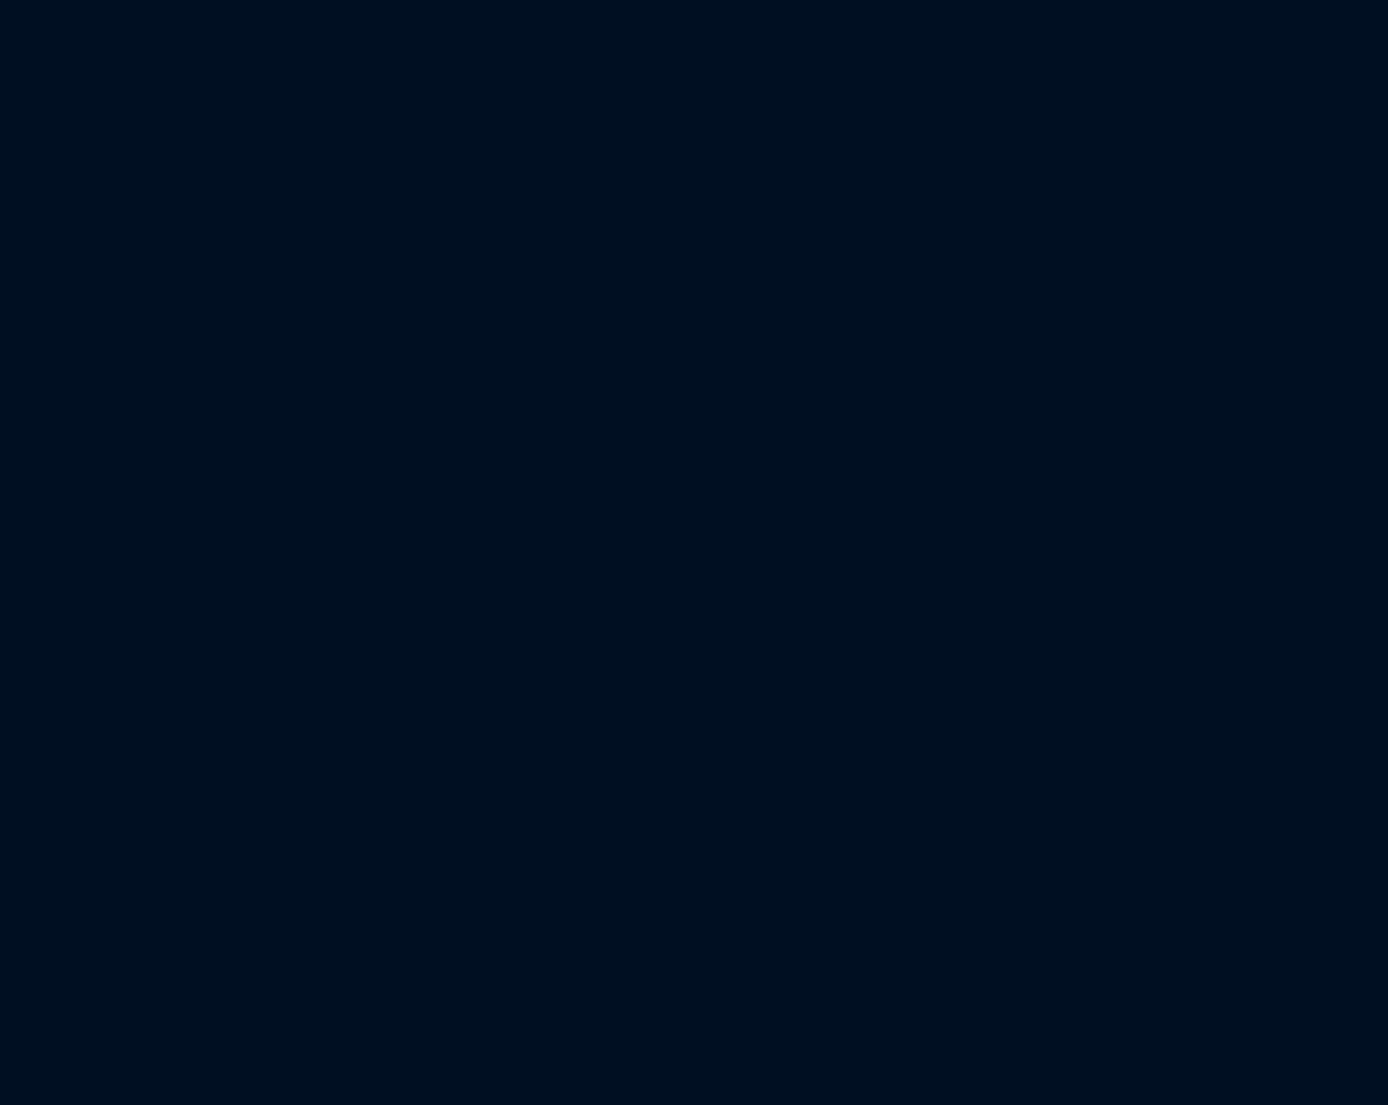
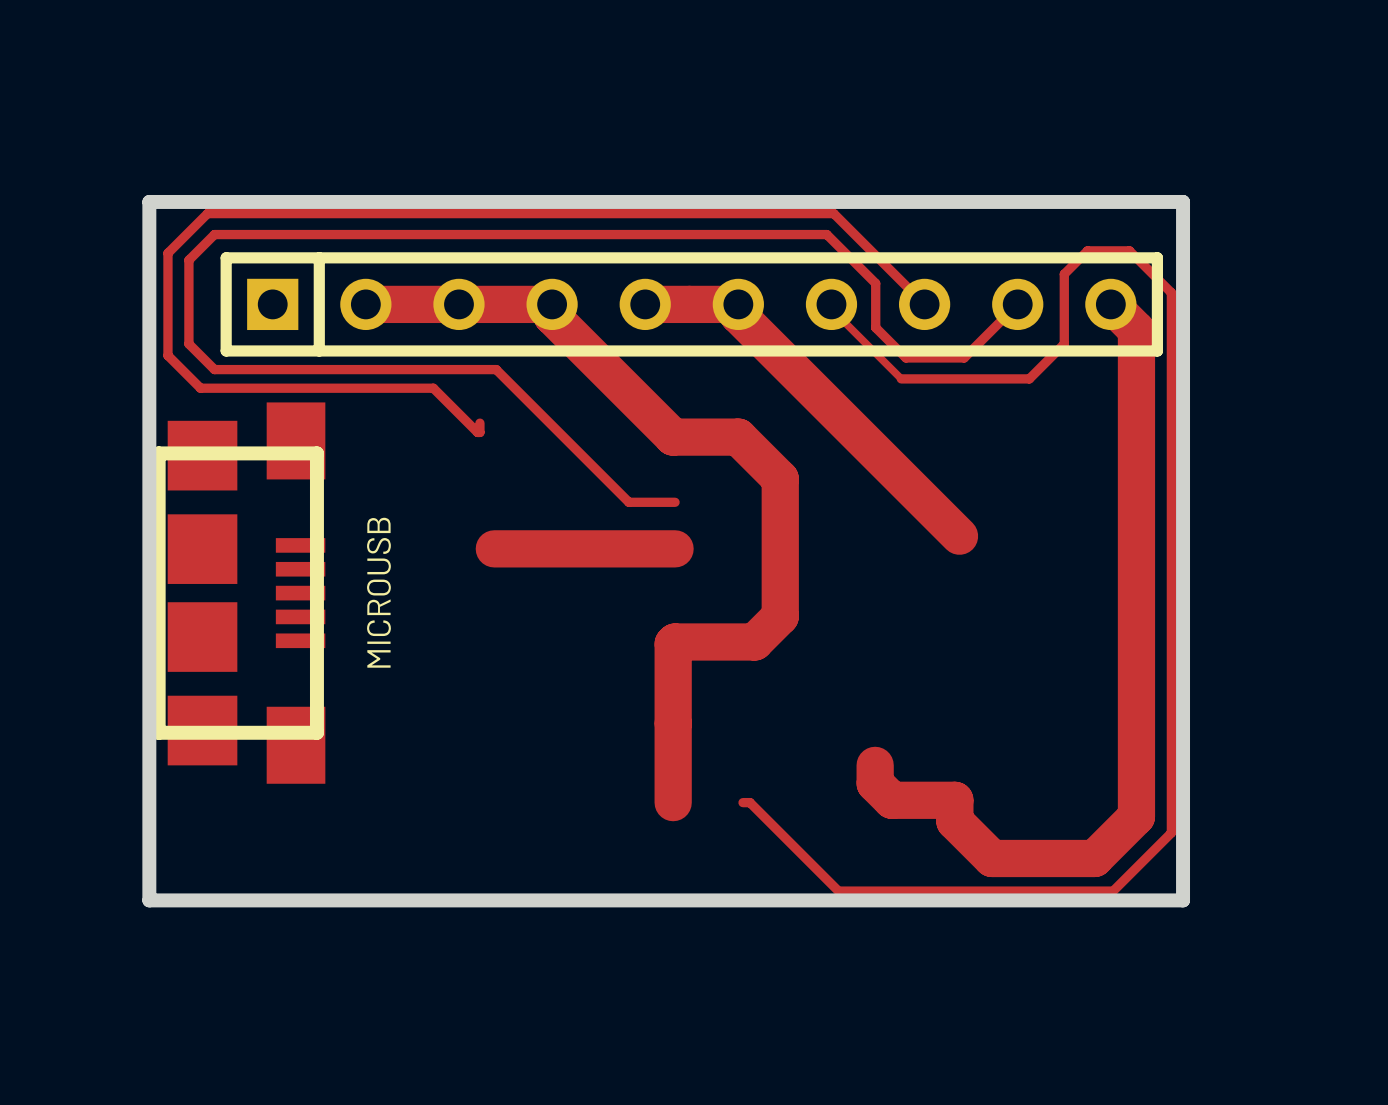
board edge: none -> (149, 201) (149, 900) (1183, 900) (1183, 201) (149, 201)
top track: none -> (365, 304) (552, 304) (552, 316) (673, 437) (738, 437) (780, 479) (780, 616) (754, 641) (675, 641) (673, 643) (673, 802)
top track: none -> (645, 304) (738, 304) (738, 315) (959, 536)
part: none -> (691, 304)
top track: none -> (831, 304) (831, 309) (901, 378) (1029, 378) (1064, 343) (1064, 274) (1087, 250) (1129, 250) (1171, 292) (1171, 832) (1114, 890) (837, 890) (750, 802) (743, 802)
top track: none -> (924, 304) (833, 213) (207, 213) (167, 253) (167, 355) (200, 388) (433, 388) (477, 432) (479, 432) (479, 423)
top track: none -> (1017, 304) (964, 357) (905, 357) (875, 327) (875, 283) (826, 234) (214, 234) (188, 260) (188, 343) (214, 369) (496, 369) (628, 502) (675, 502)
top track: none -> (1110, 304) (1136, 330) (1136, 816) (1094, 858) (992, 858) (954, 821) (954, 800) (892, 800) (875, 783) (875, 765)
top track: none -> (494, 548) (675, 548)
part: none -> MICROUSB (238, 593)

